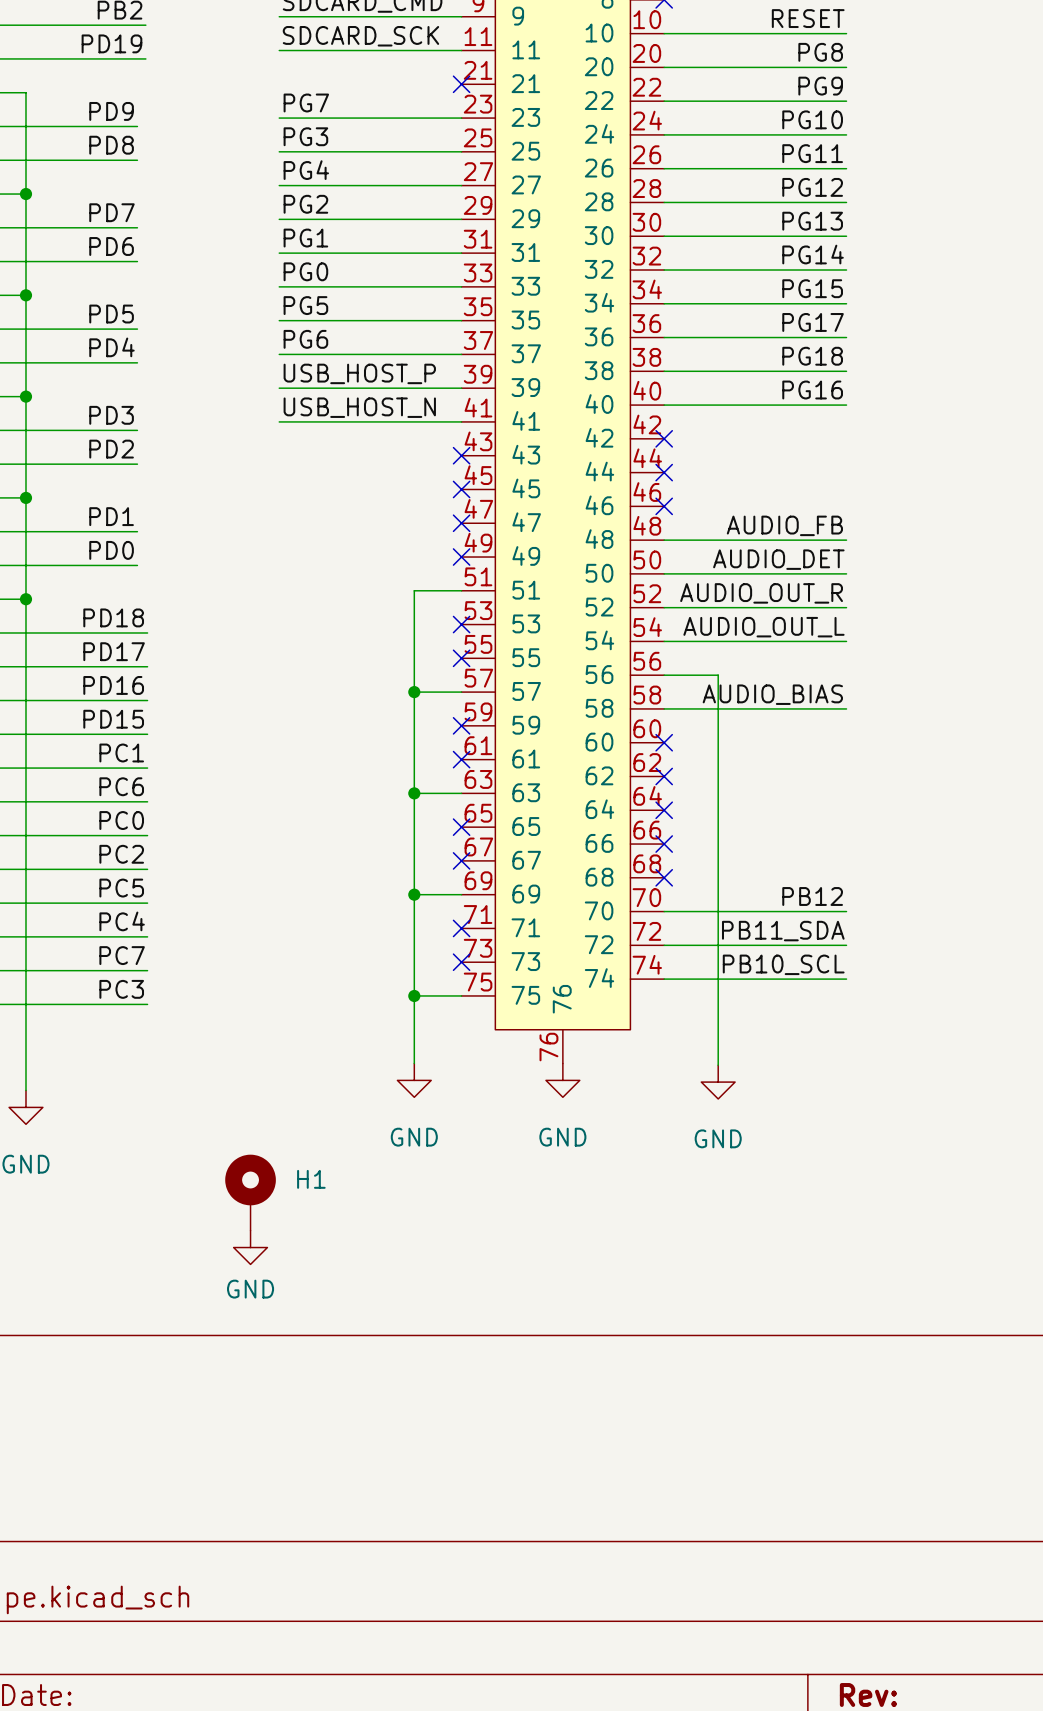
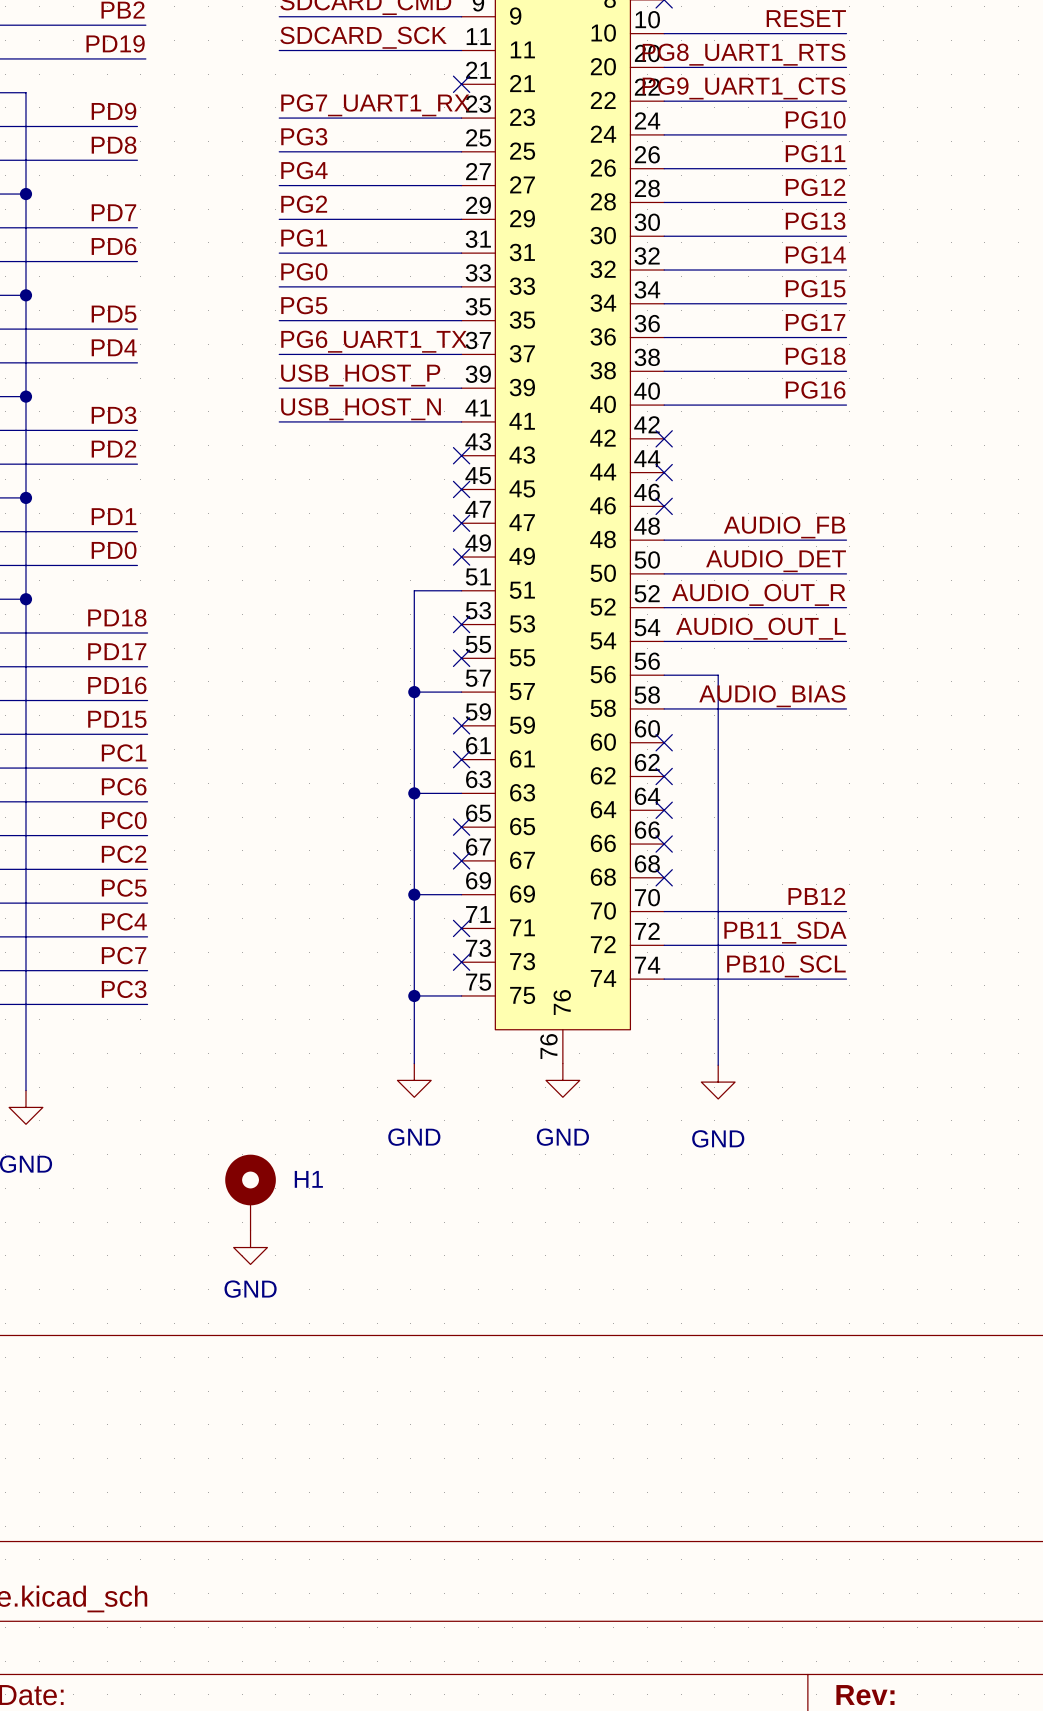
label: PG8 (820, 52) -> PG8_UART1_RTS (743, 54)
label: PG9 (820, 86) -> PG9_UART1_CTS (743, 88)
label: PG7 (306, 102) -> PG7_UART1_RX (375, 105)
label: PG6 (305, 339) -> PG6_UART1_TX (374, 341)

